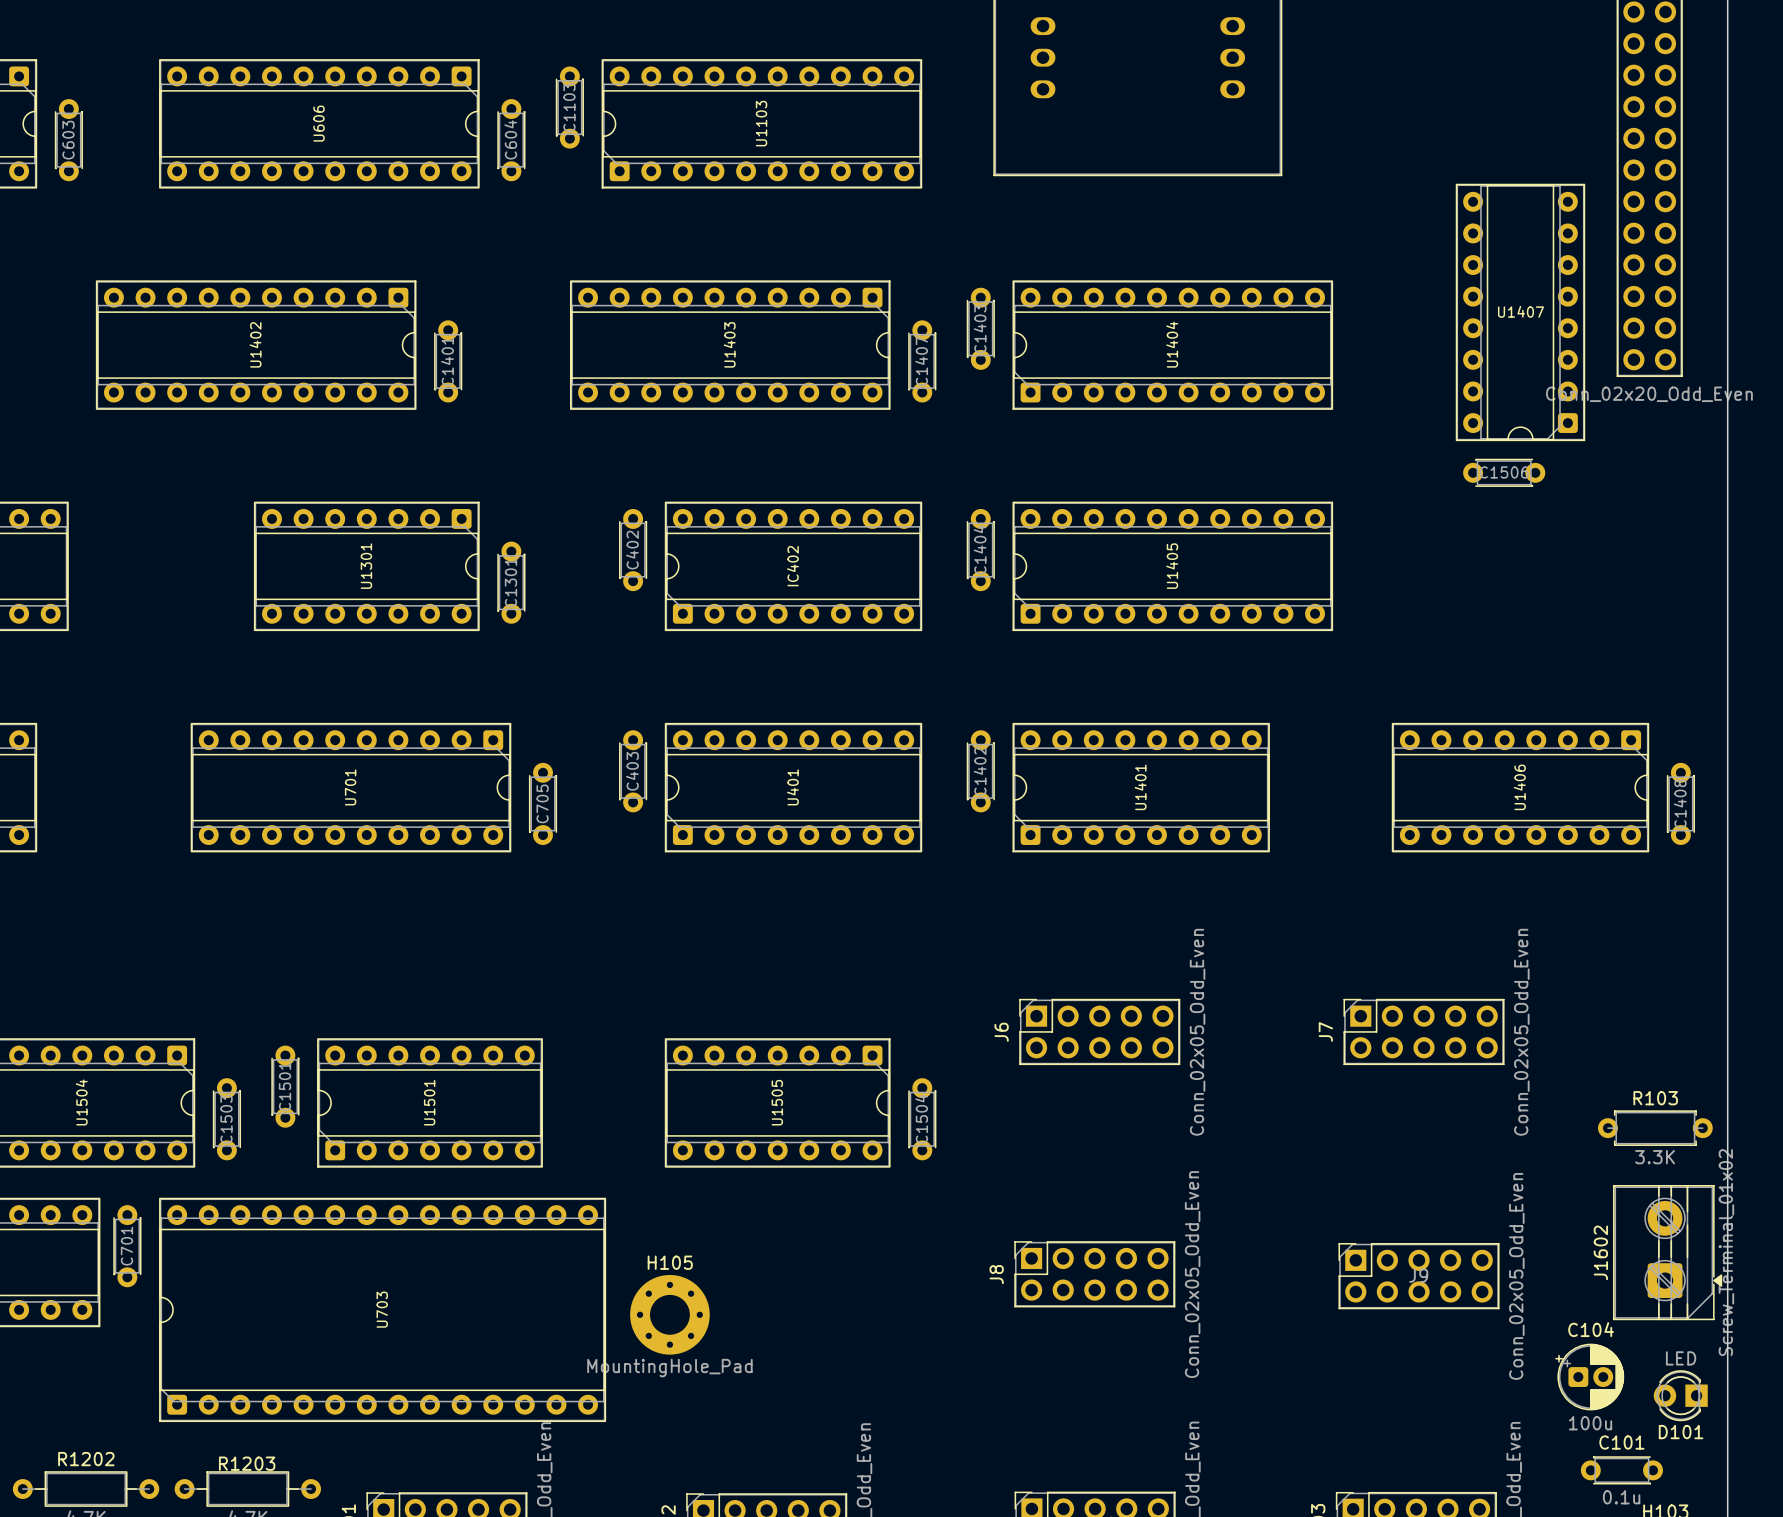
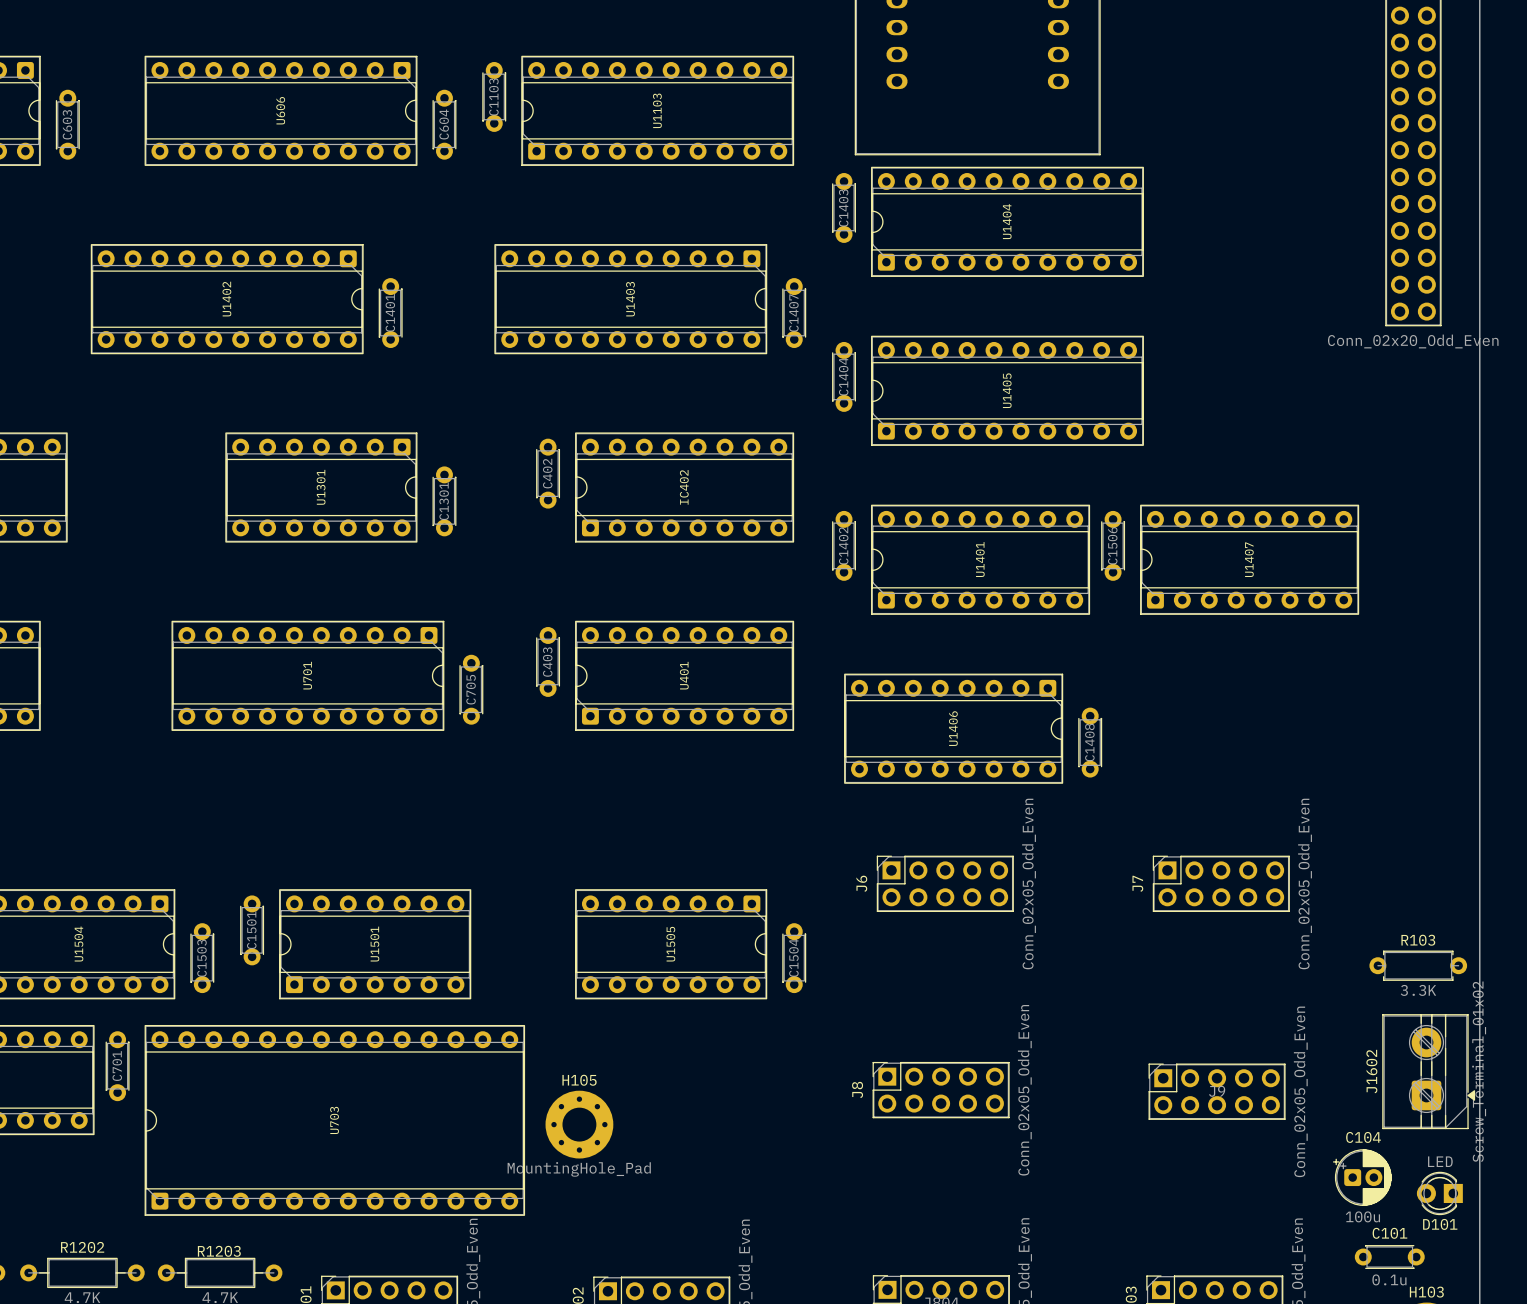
U1407 rotation: 0° (1520, 312) -> 90° clockwise (1249, 559)
U1407 position: (1520, 312) -> (1249, 559)
C1403 position: (980, 328) -> (844, 207)
U1404 position: (1172, 345) -> (1007, 221)
C1506 rotation: 0° (1504, 472) -> 90° clockwise (1113, 545)
C1506 position: (1504, 472) -> (1113, 545)
C1404 position: (980, 550) -> (844, 376)
U1405 position: (1172, 566) -> (1007, 390)
C1402 position: (980, 771) -> (844, 545)
U1401 position: (1141, 787) -> (980, 559)
U1406 position: (1520, 787) -> (953, 728)
C1408 position: (1680, 803) -> (1090, 742)

